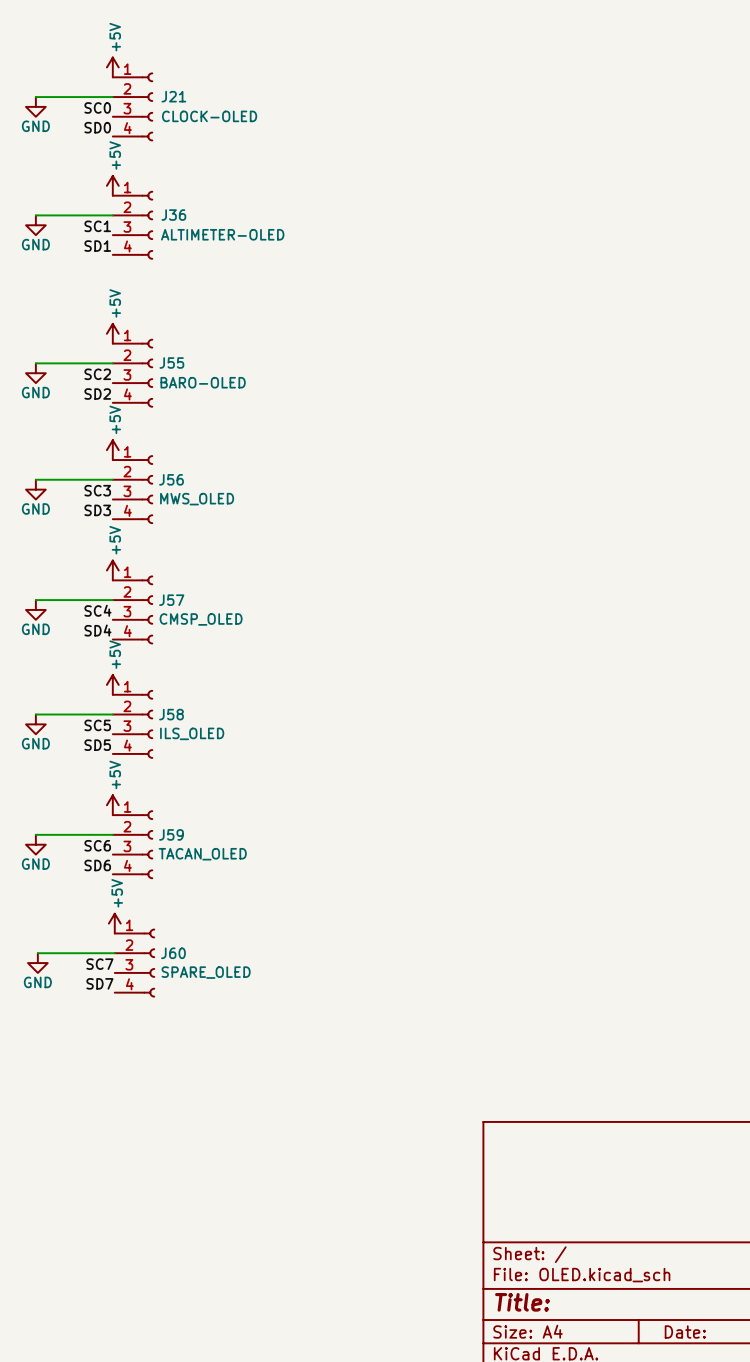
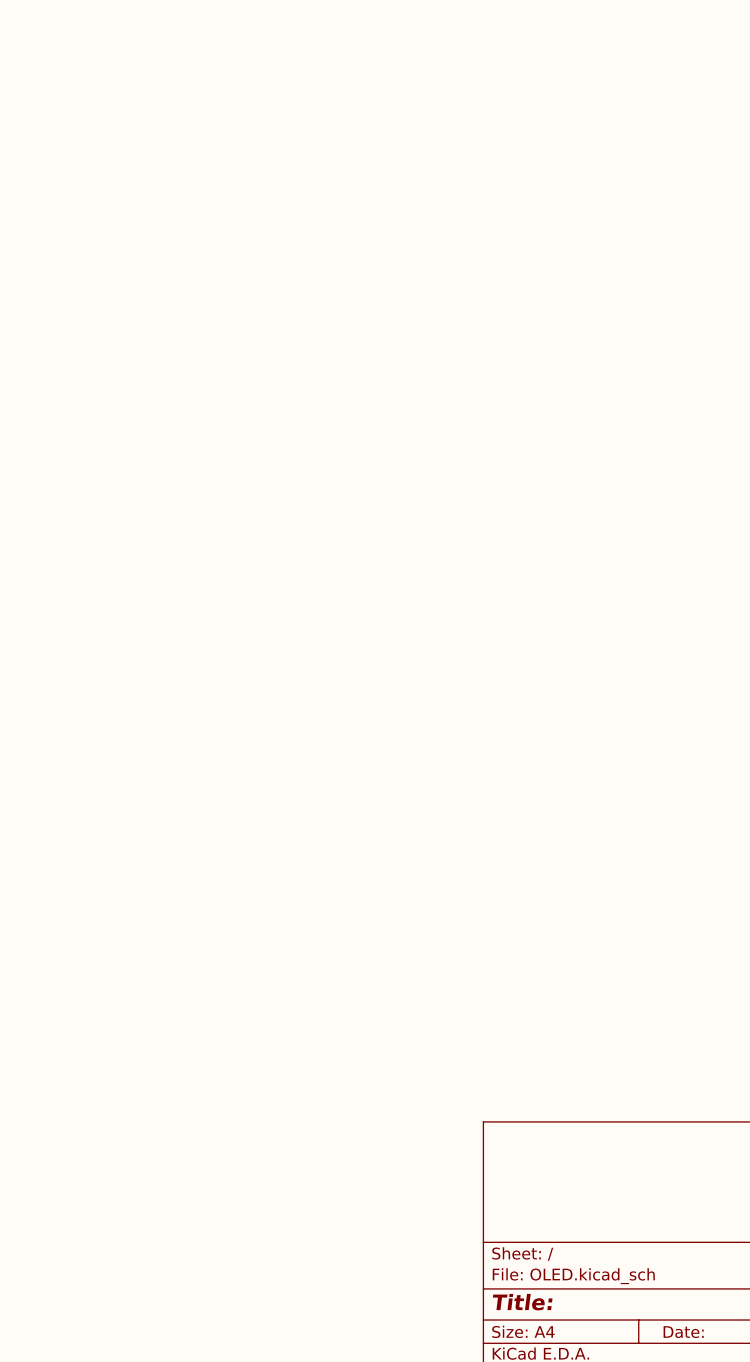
power symbol: +5V (112, 67) -> none
wire: (35, 97) (112, 97) -> none
power symbol: GND (35, 106) -> none
J21: CLOCK-OLED (132, 106) -> none
label: SC0 (97, 107) -> none
label: SD0 (97, 127) -> none
power symbol: +5V (112, 185) -> none
wire: (35, 215) (112, 215) -> none
power symbol: GND (35, 225) -> none
J36: ALTIMETER-OLED (132, 225) -> none
label: SC1 (97, 226) -> none
label: SD1 (97, 246) -> none
power symbol: +5V (112, 333) -> none
wire: (35, 363) (112, 363) -> none
power symbol: GND (35, 373) -> none
J55: BARO-OLED (132, 373) -> none
label: SC2 (97, 374) -> none
label: SD2 (97, 394) -> none
power symbol: +5V (112, 450) -> none
wire: (35, 479) (112, 479) -> none
power symbol: GND (35, 489) -> none
J56: MWS_OLED (132, 489) -> none
label: SC3 (97, 490) -> none
label: SD3 (97, 510) -> none
power symbol: +5V (112, 570) -> none
wire: (35, 600) (112, 600) -> none
power symbol: GND (35, 609) -> none
J57: CMSP_OLED (132, 609) -> none
label: SC4 (97, 610) -> none
label: SD4 (97, 630) -> none
power symbol: +5V (112, 684) -> none
wire: (35, 714) (112, 714) -> none
power symbol: GND (35, 724) -> none
J58: ILS_OLED (132, 724) -> none
label: SC5 (97, 725) -> none
label: SD5 (97, 745) -> none
power symbol: +5V (112, 805) -> none
wire: (35, 834) (112, 834) -> none
power symbol: GND (35, 844) -> none
J59: TACAN_OLED (132, 844) -> none
label: SC6 (97, 845) -> none
label: SD6 (97, 865) -> none
power symbol: +5V (114, 923) -> none
wire: (37, 953) (114, 953) -> none
power symbol: GND (37, 963) -> none
J60: SPARE_OLED (134, 963) -> none
label: SC7 (99, 964) -> none
label: SD7 (99, 983) -> none

